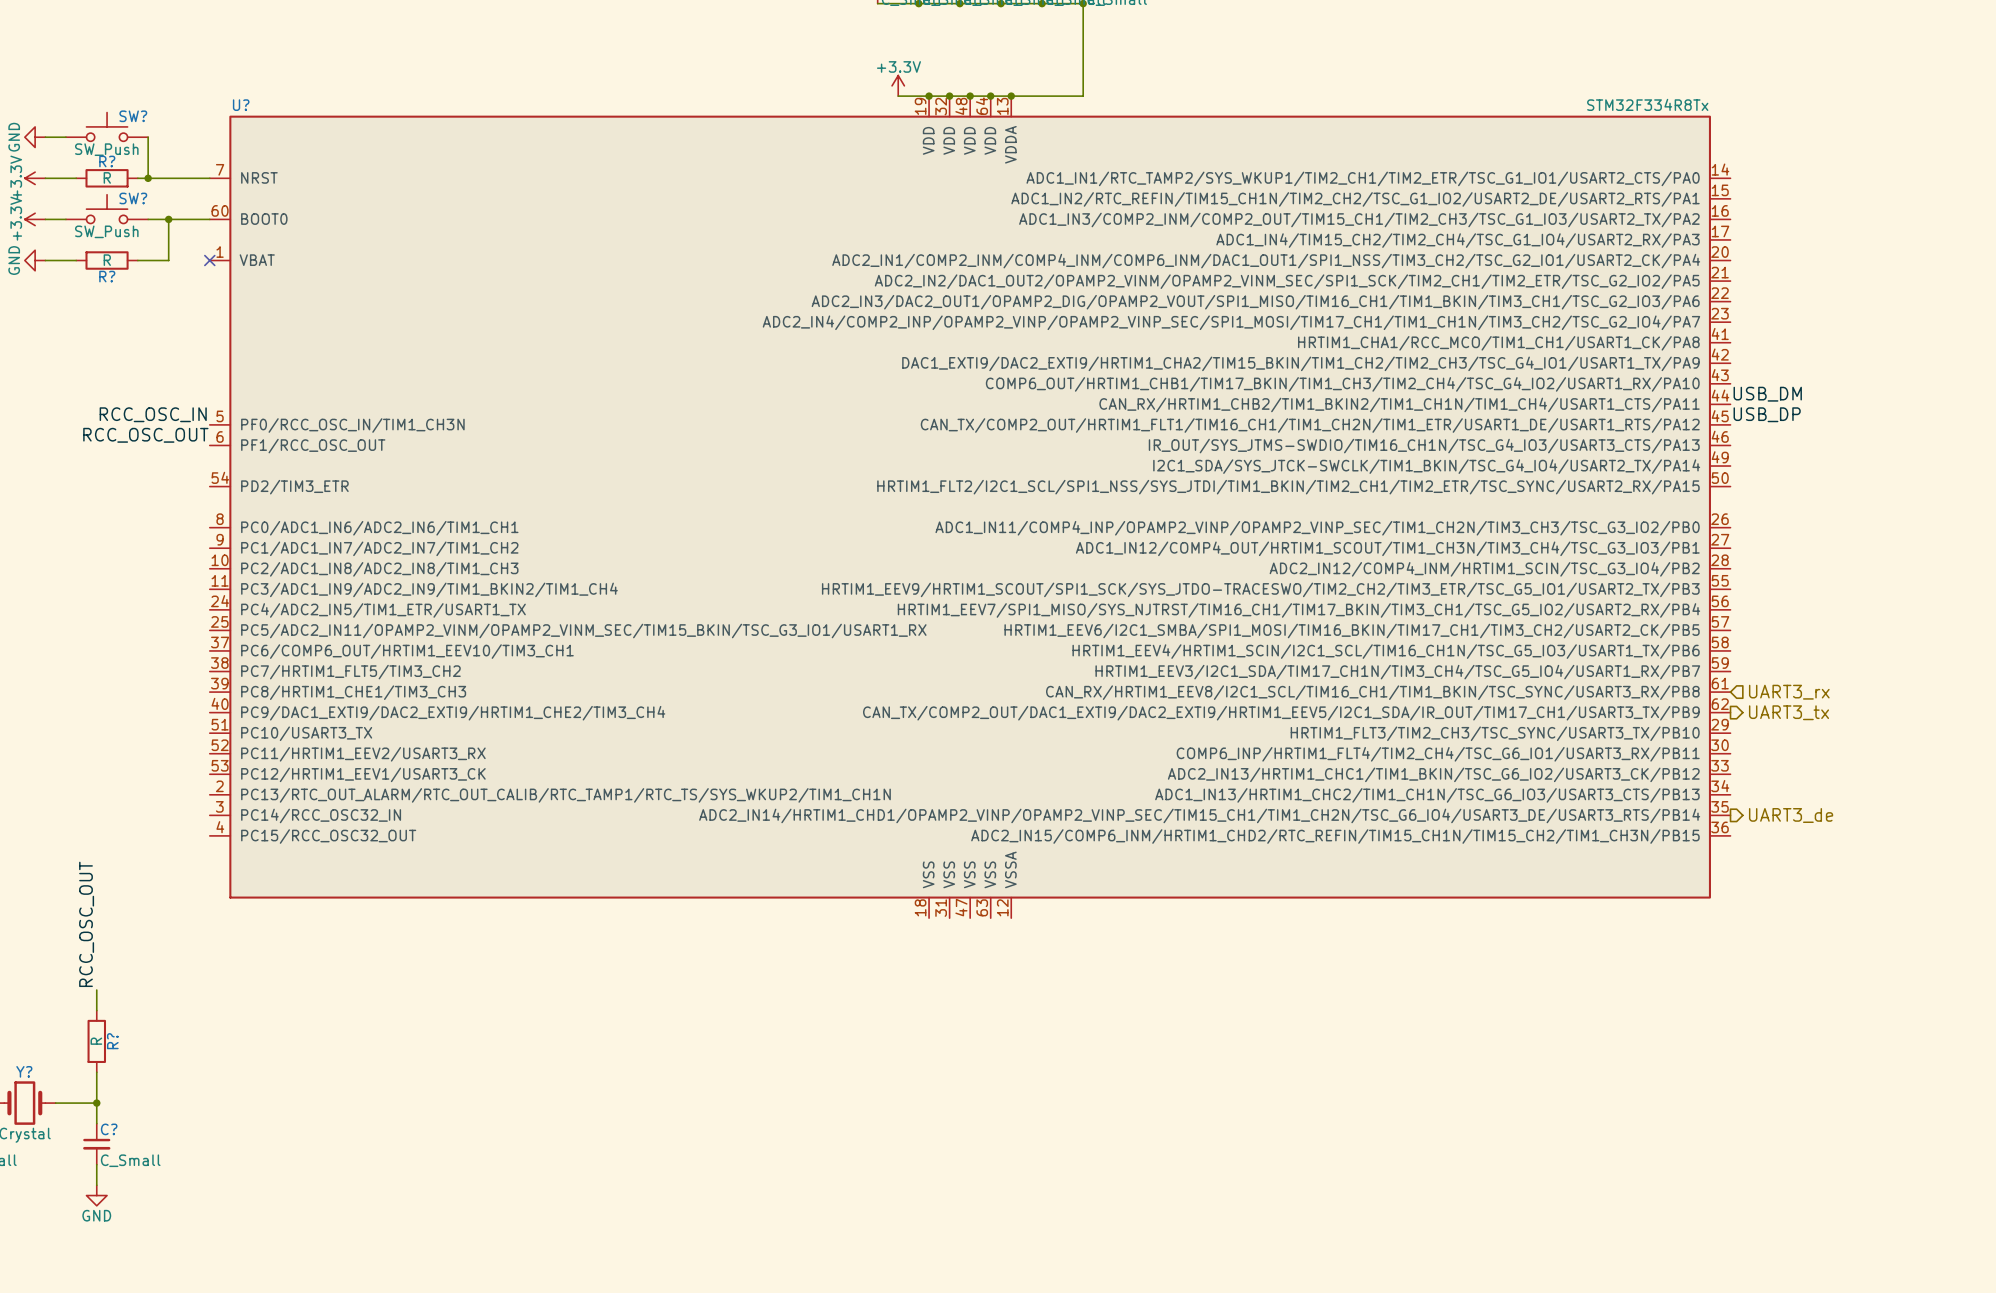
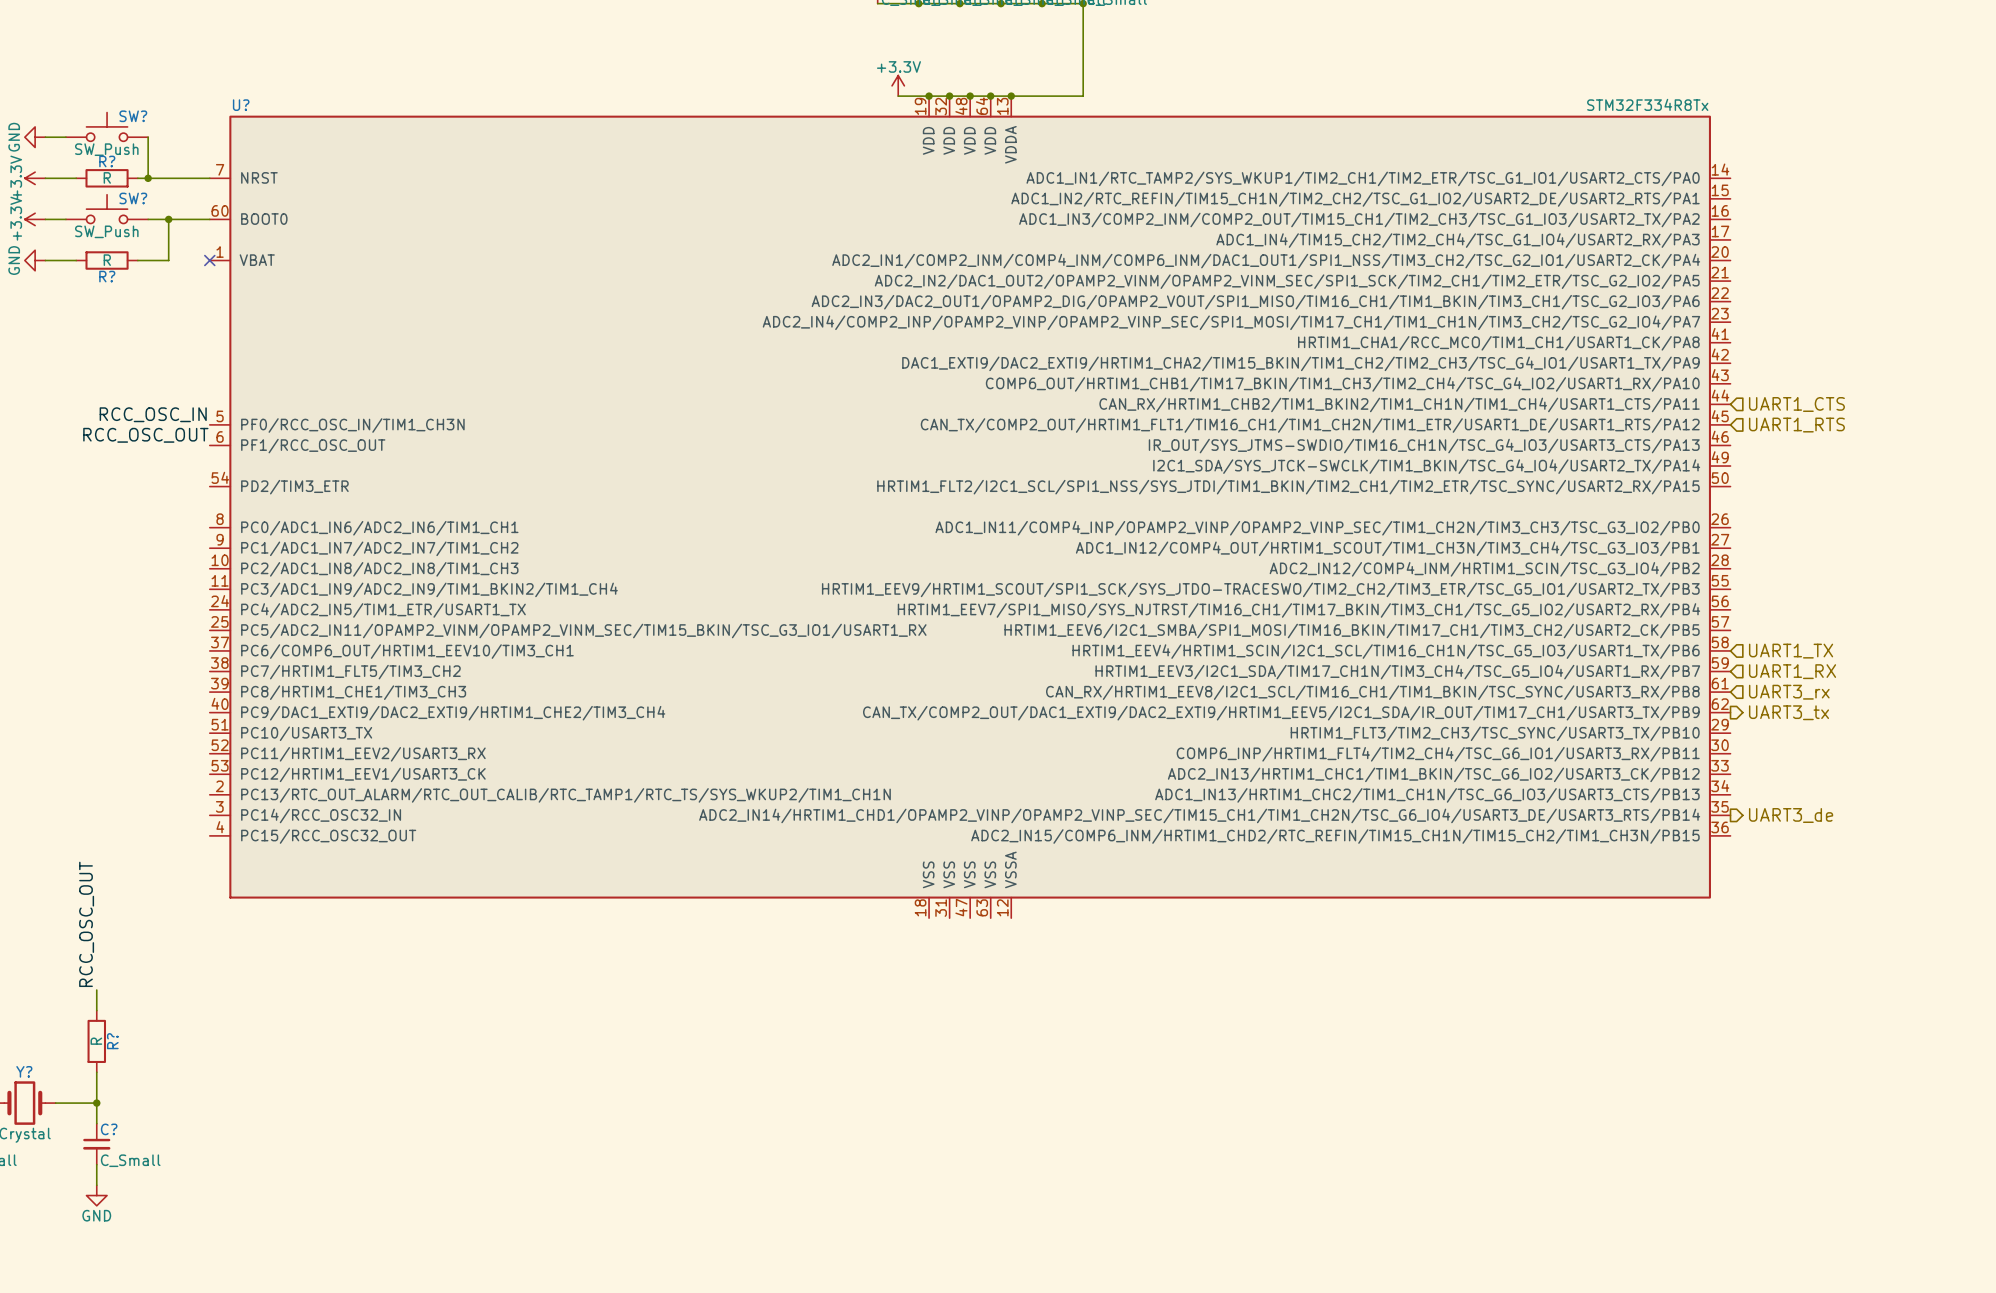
label: USB_DM (1767, 394) -> none
hierarchical label: none -> UART1_CTS (1796, 404)
label: USB_DP (1767, 414) -> none
hierarchical label: none -> UART1_RTS (1796, 425)
hierarchical label: none -> UART1_TX (1791, 651)
hierarchical label: none -> UART1_RX (1792, 671)

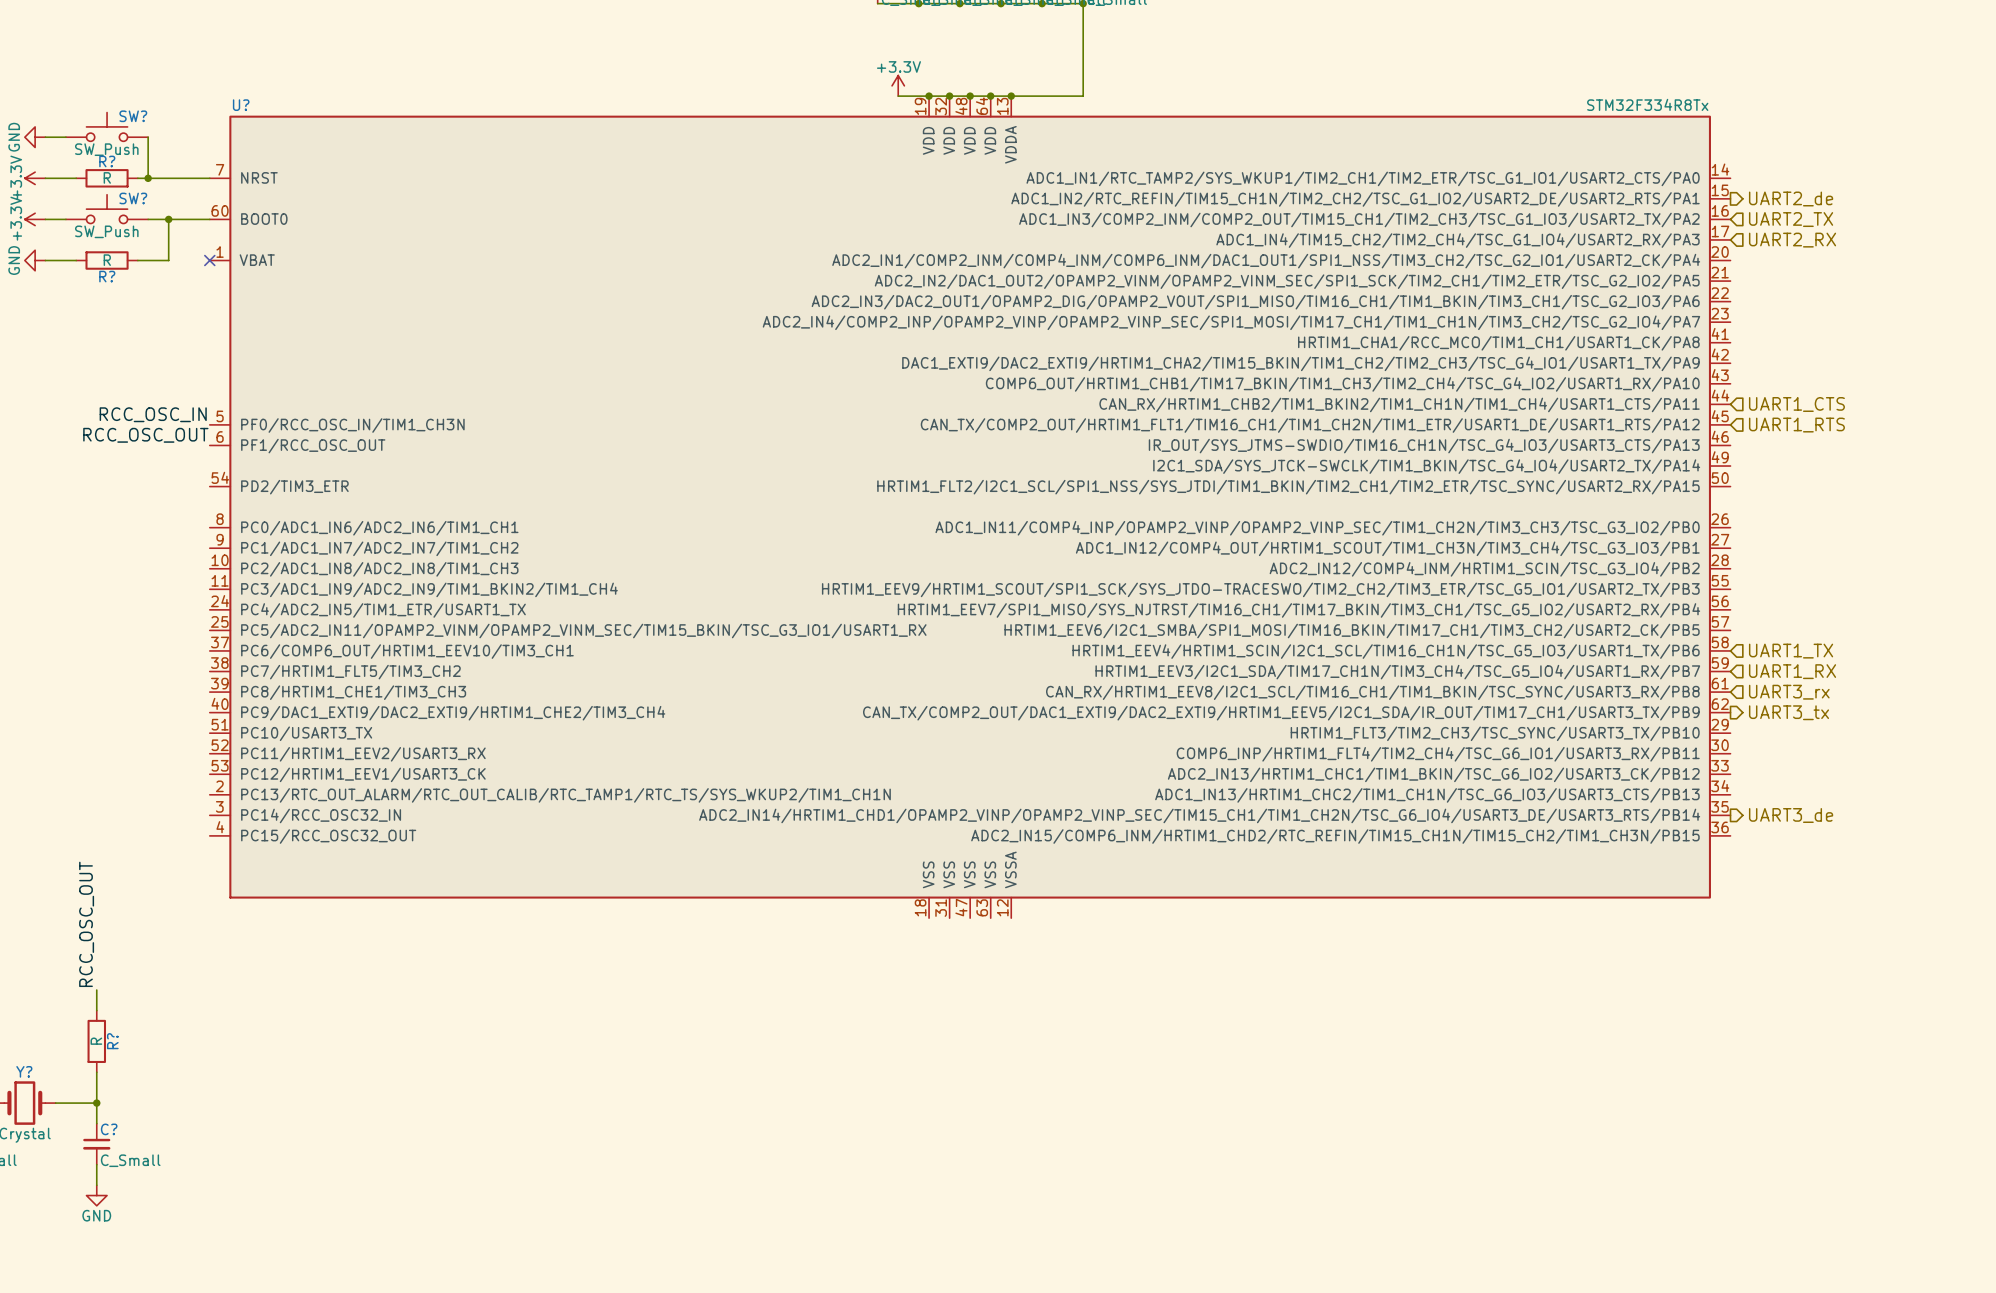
hierarchical label: none -> UART2_de (1791, 198)
hierarchical label: none -> UART2_TX (1791, 219)
hierarchical label: none -> UART2_RX (1792, 240)

